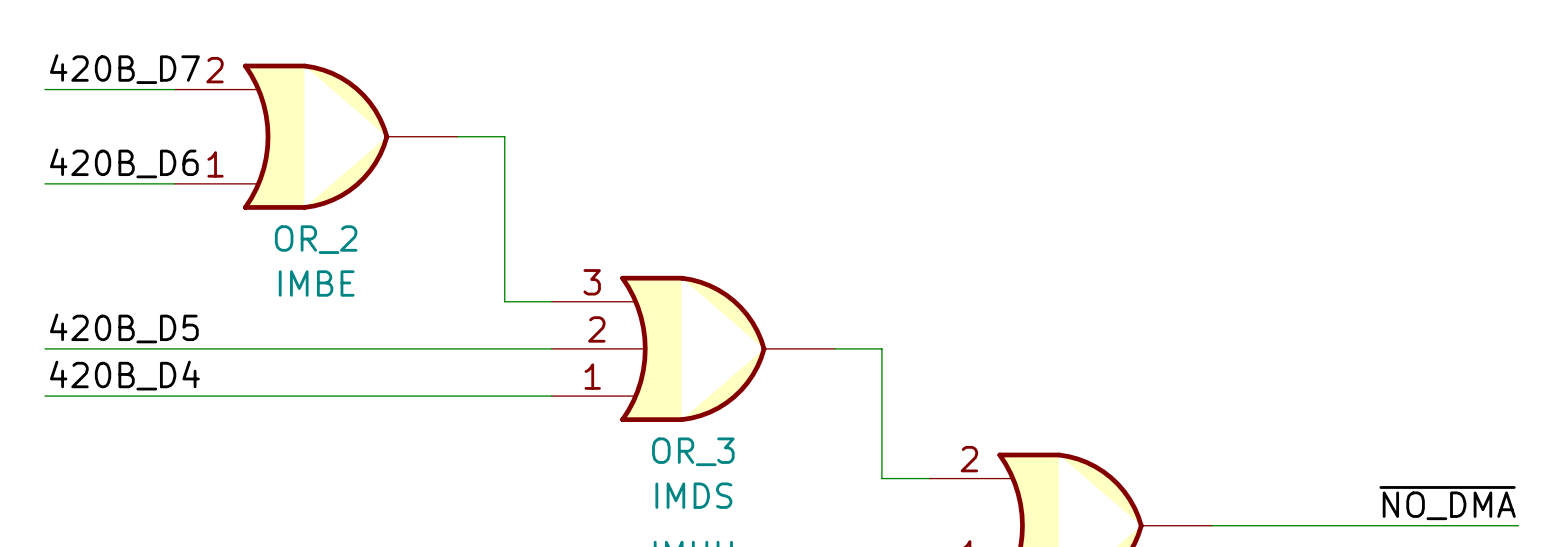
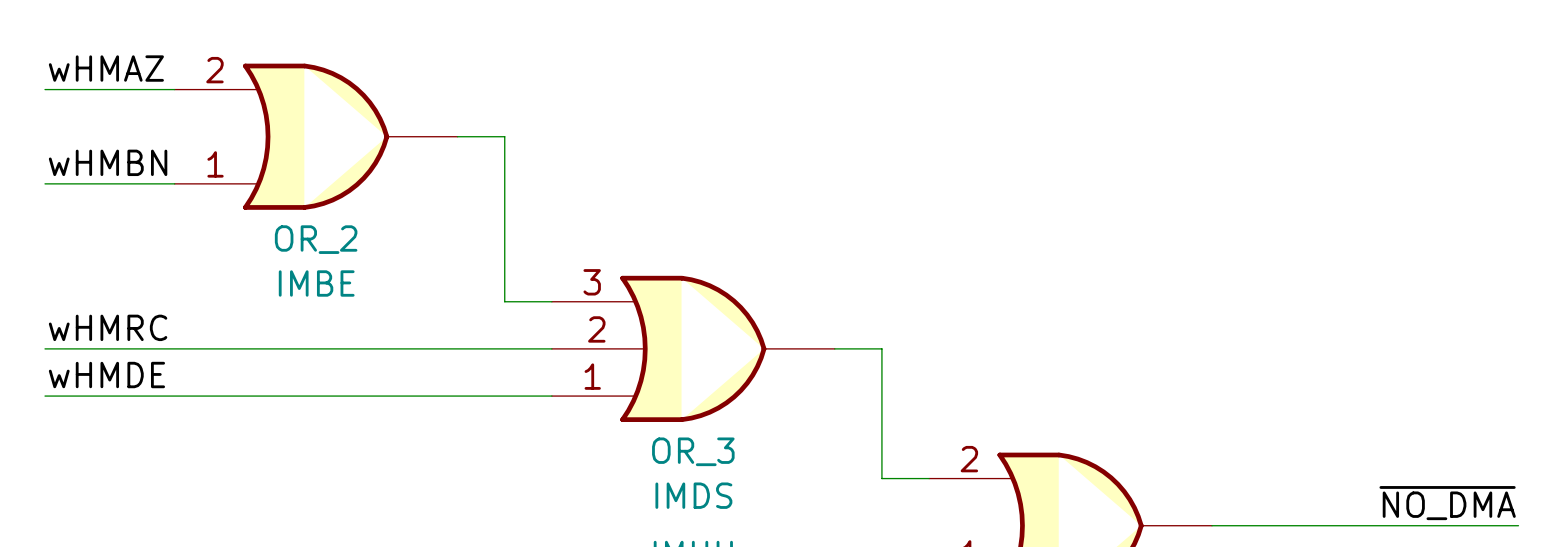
label: 420B_D7 (124, 69) -> wHMAZ (106, 68)
label: 420B_D6 (124, 163) -> wHMBN (108, 162)
label: 420B_D5 (124, 328) -> wHMRC (108, 327)
label: 420B_D4 (124, 375) -> wHMDE (106, 375)

